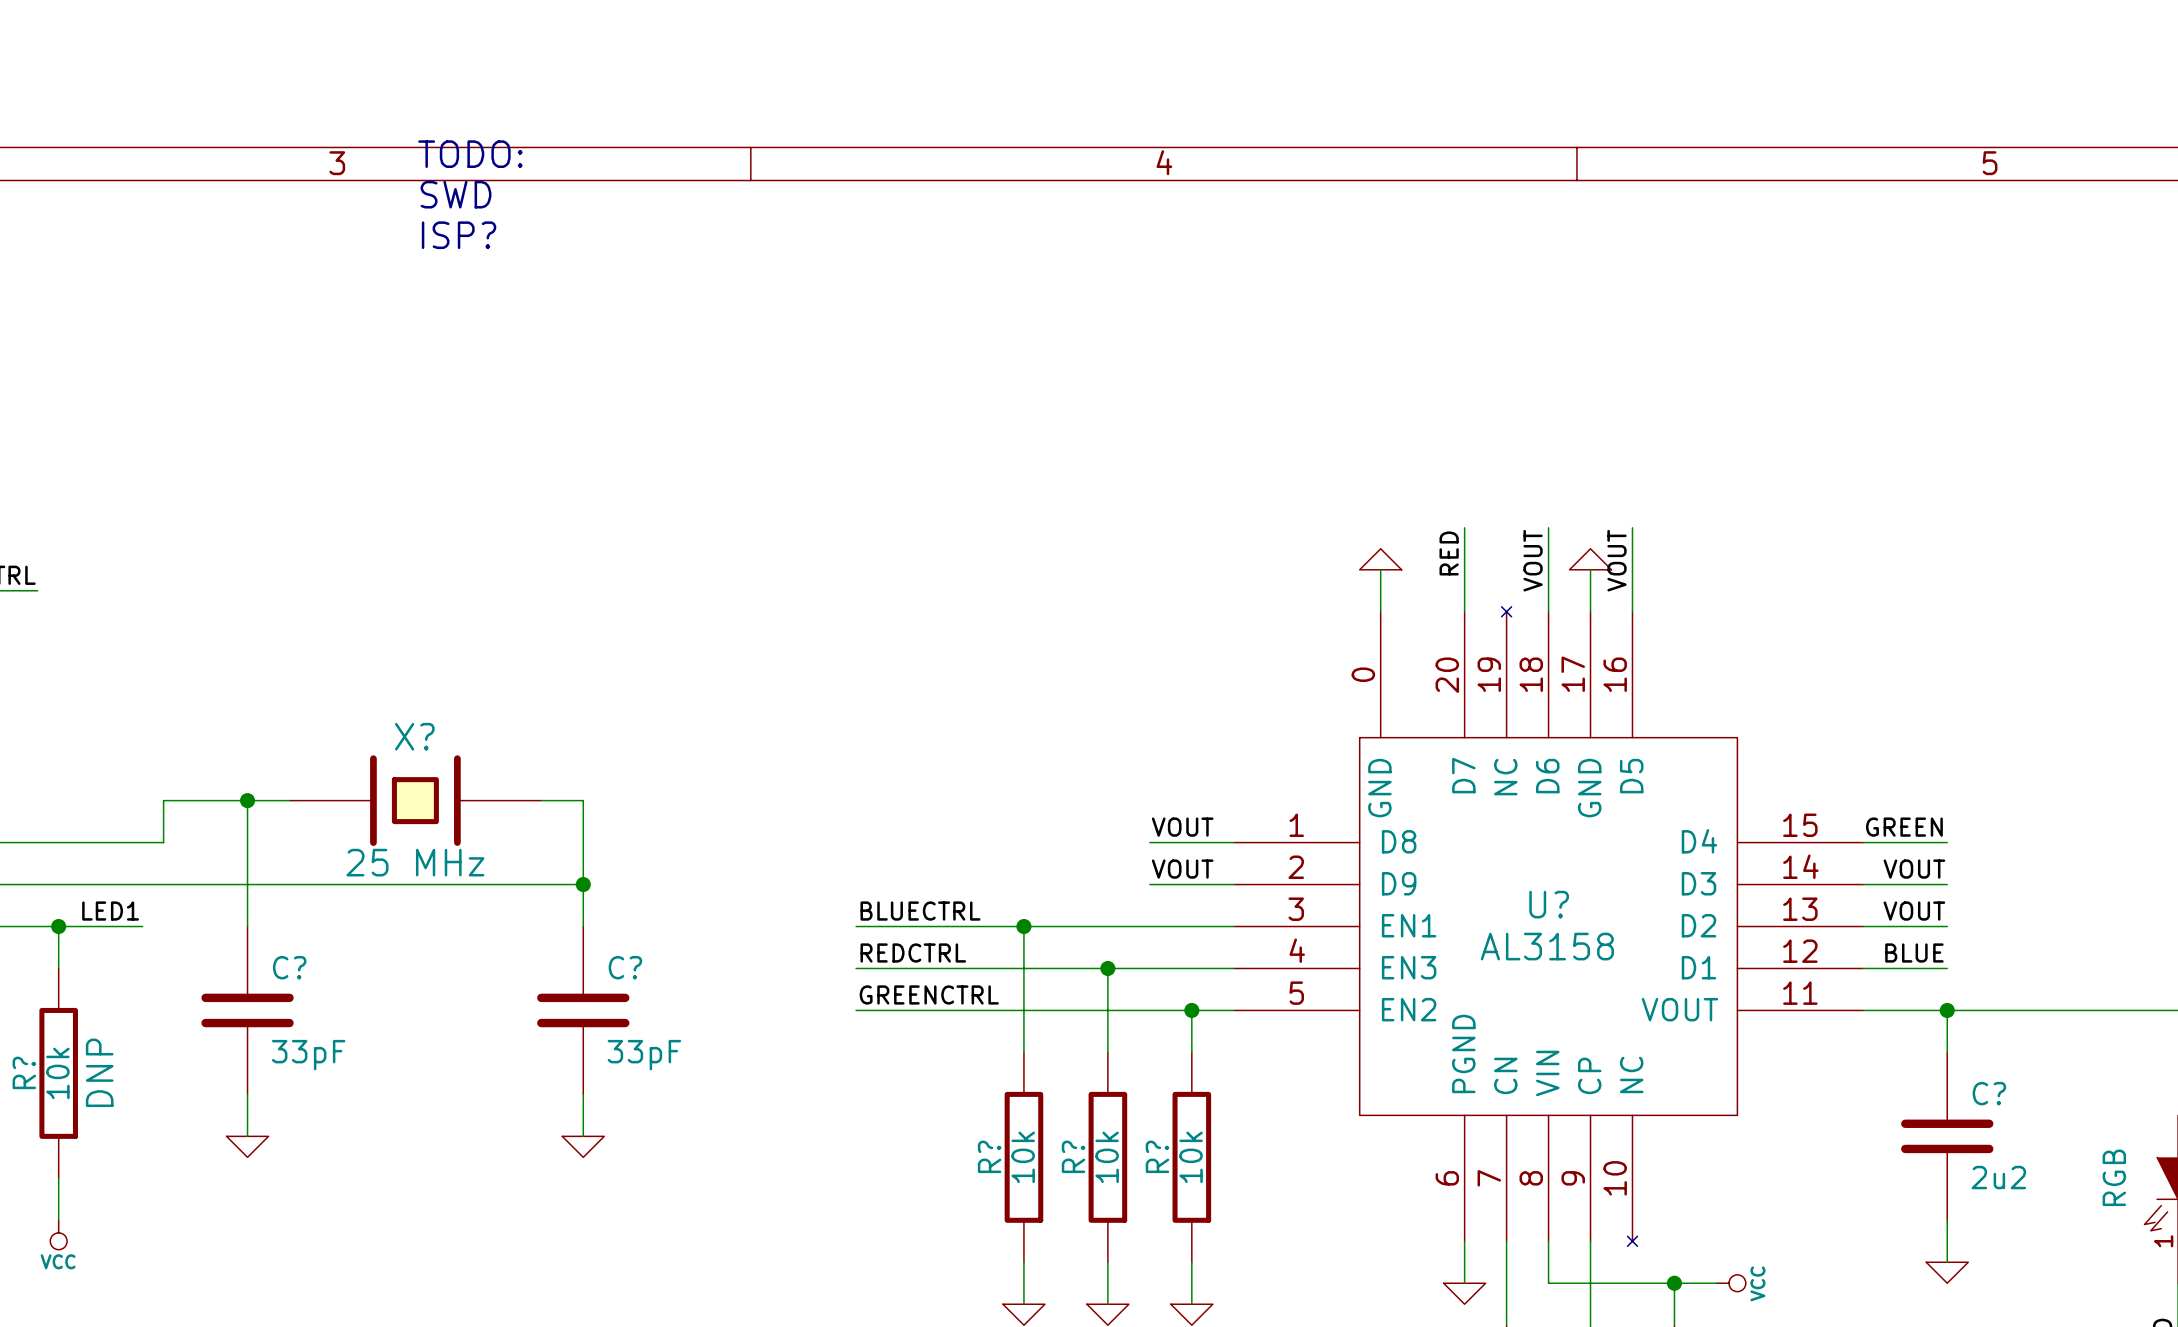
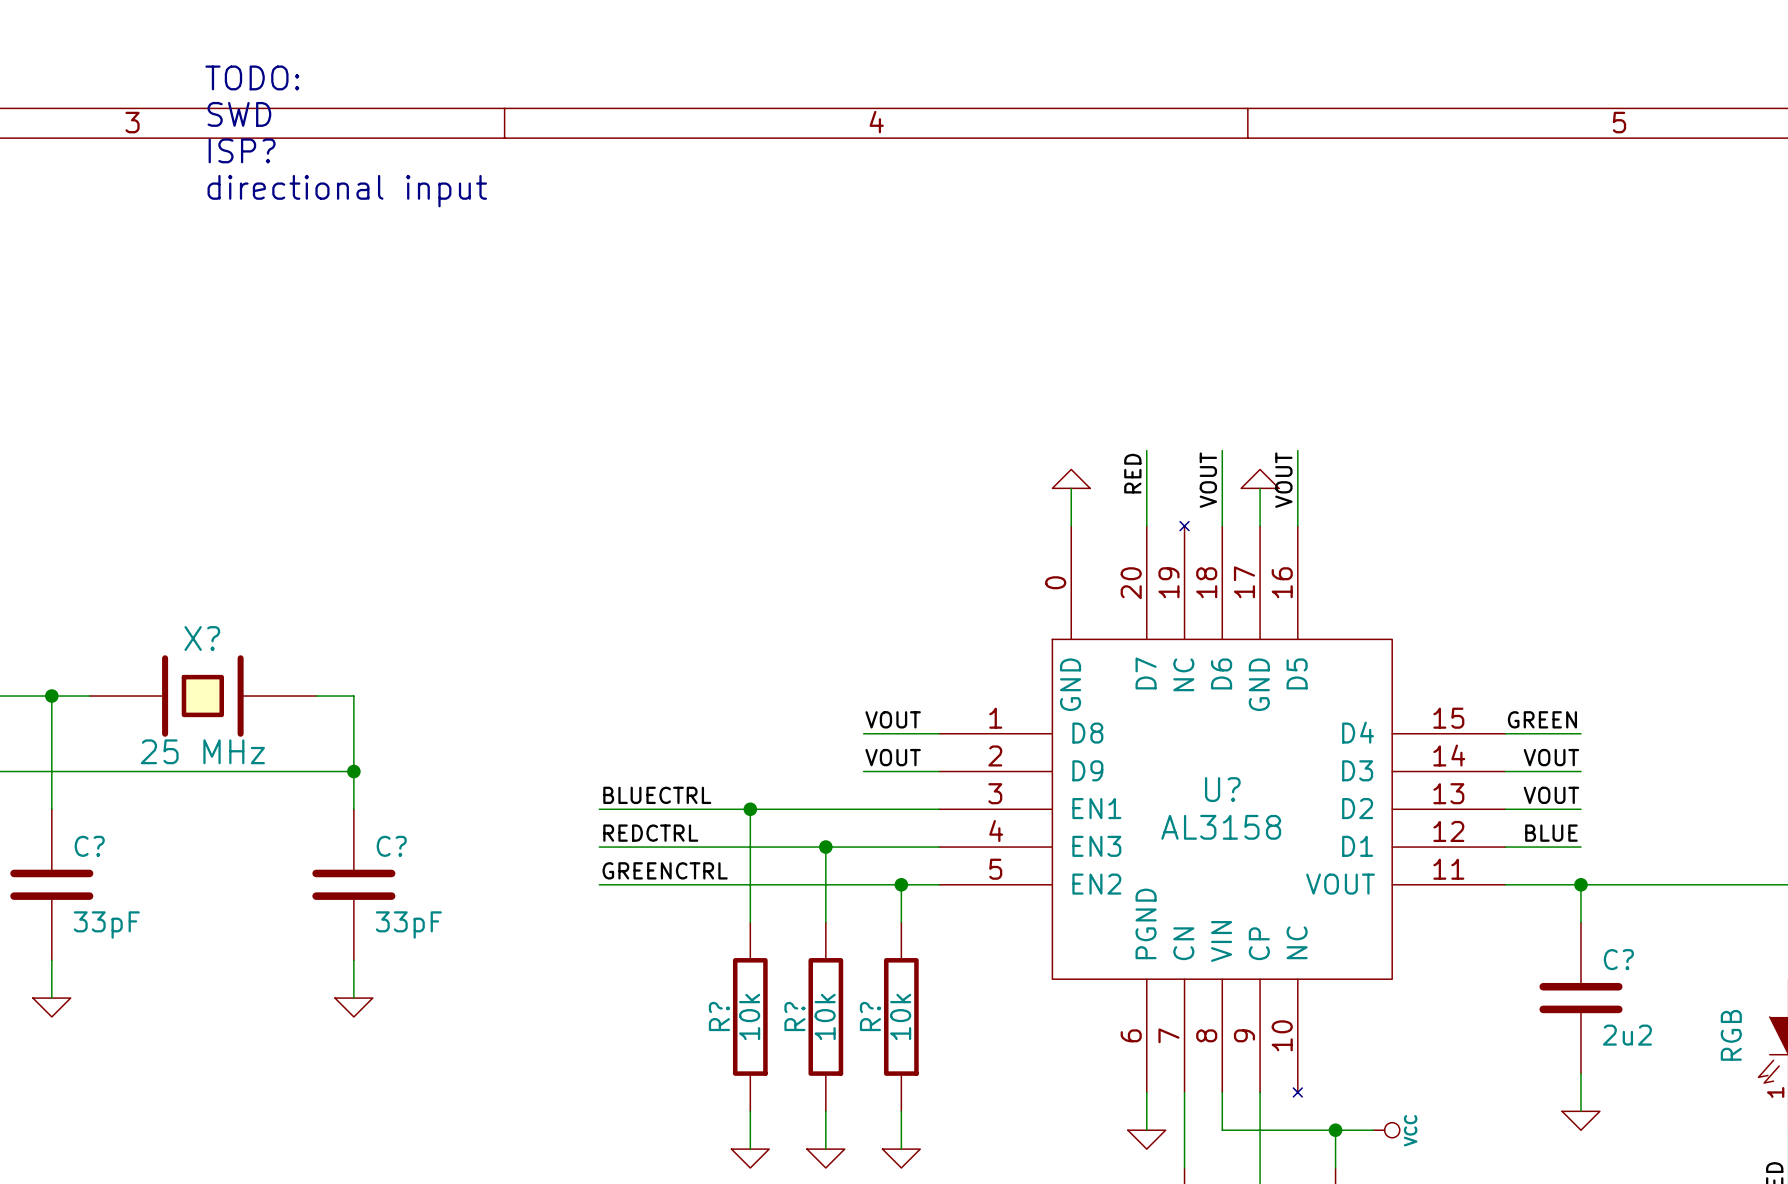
text: none -> TODO: (252, 77)
text: TODO: (470, 154) -> SWD (239, 114)
text: SWD (456, 194) -> ISP? (242, 150)
text: ISP? (459, 235) -> directional input (347, 191)

